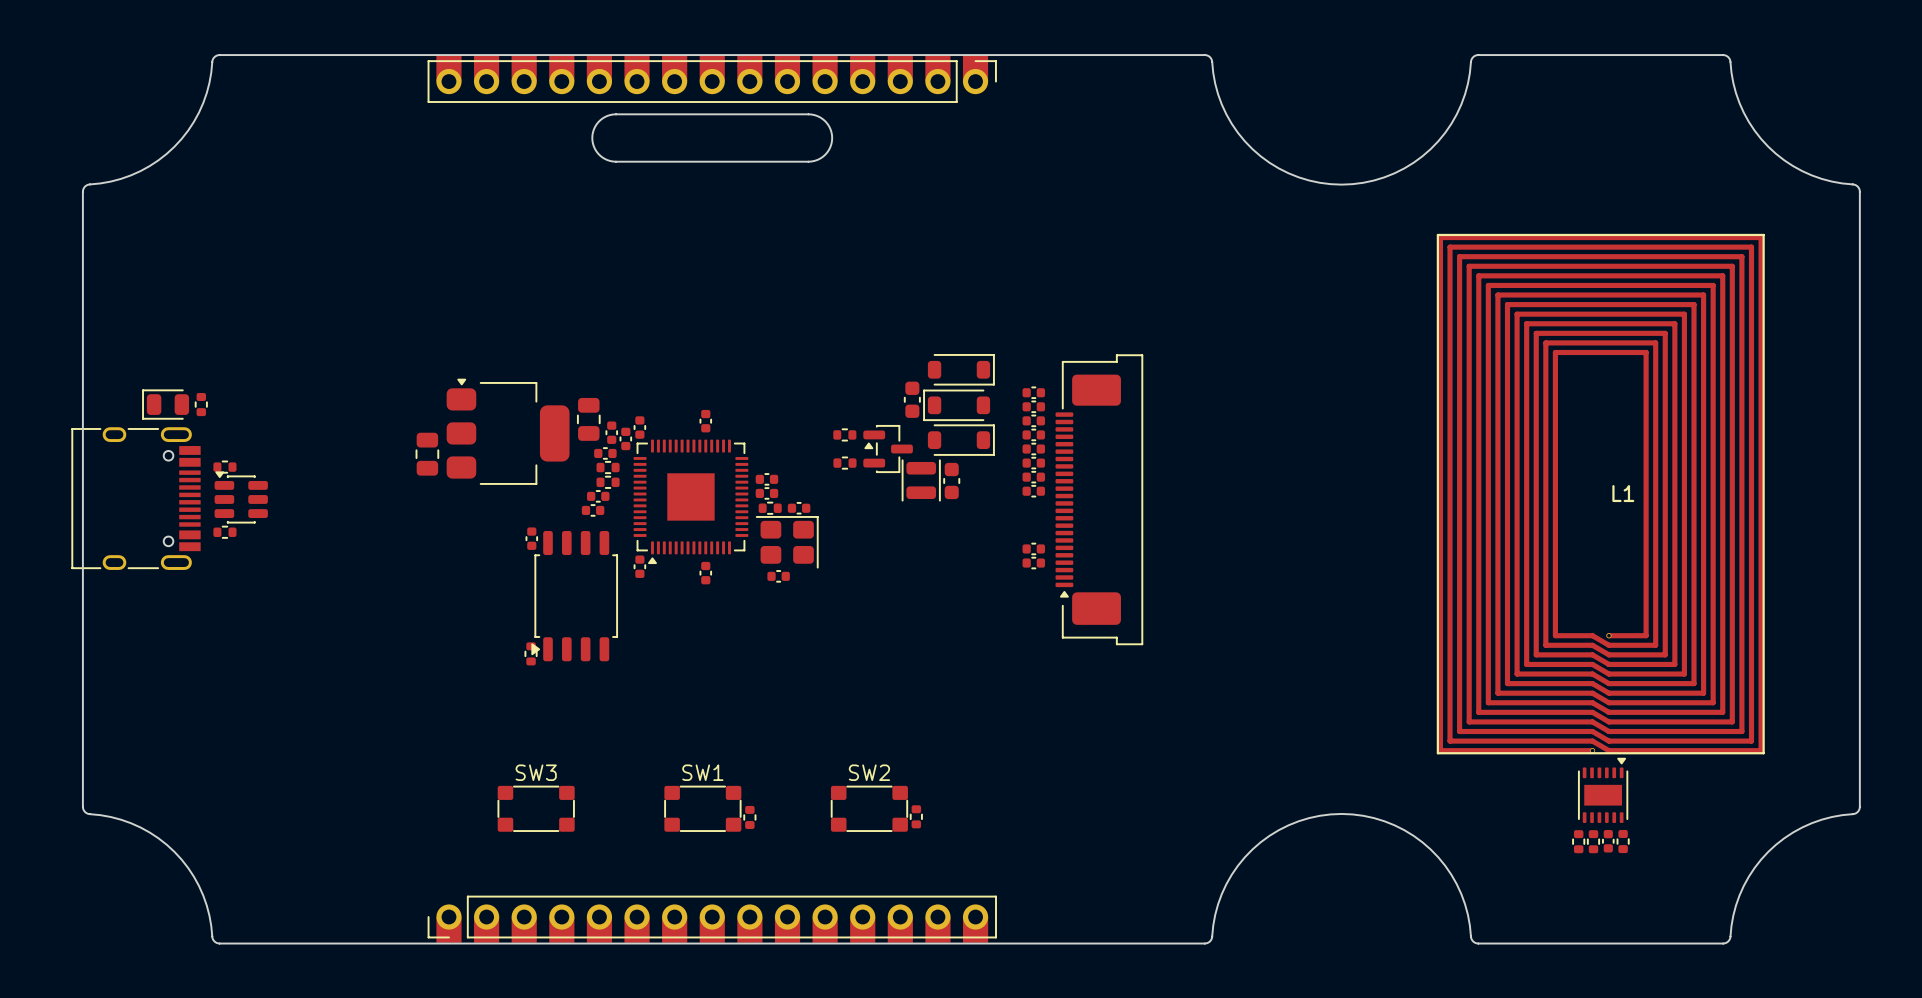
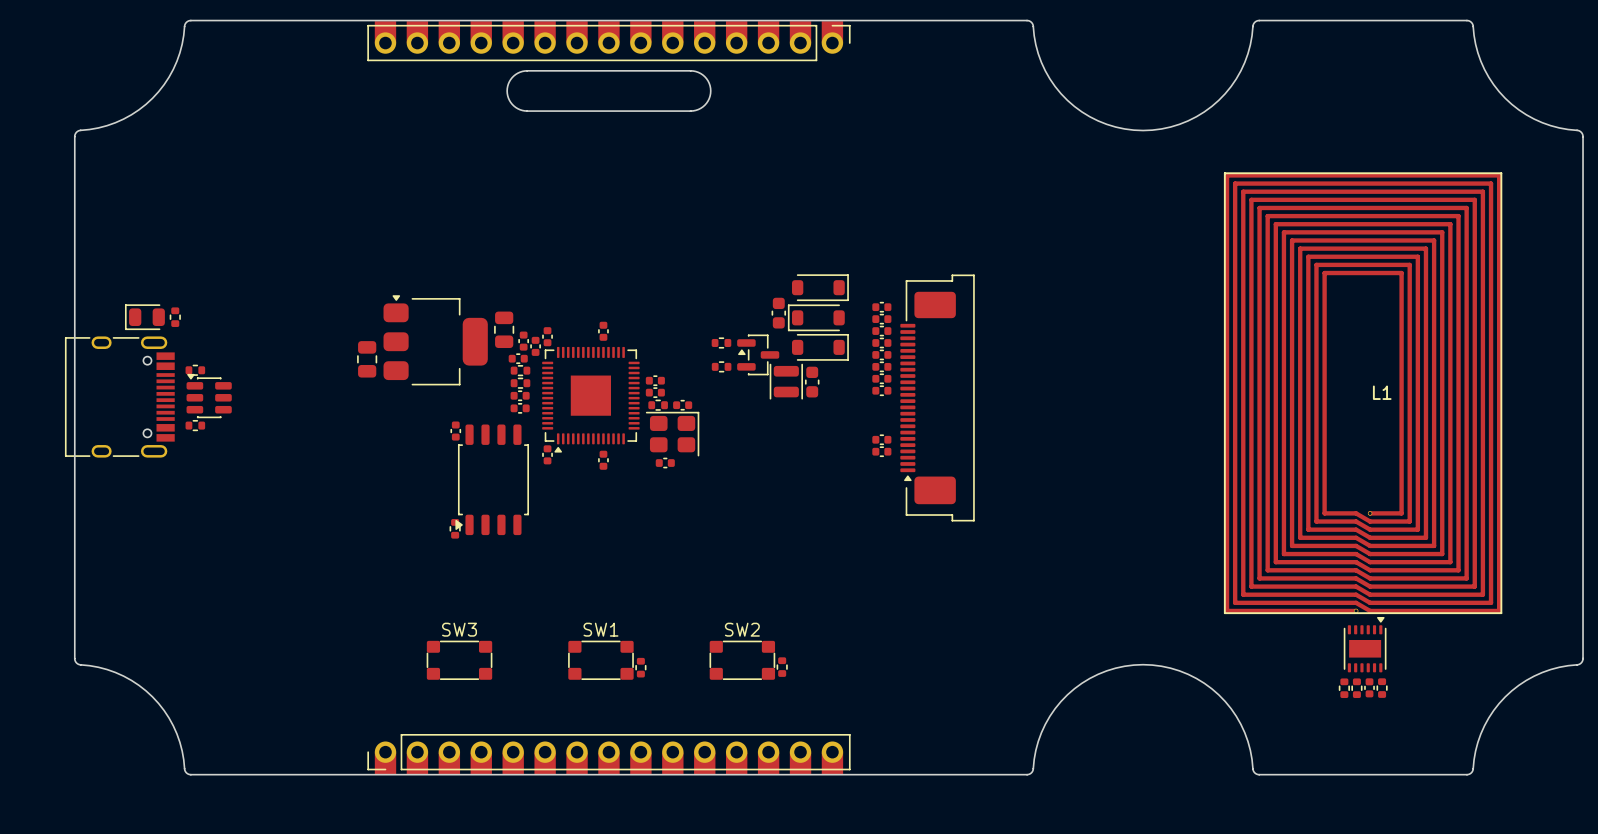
part: (598, 496) -> none
part: none -> (520, 395)
part: (593, 510) -> none
part: none -> (520, 408)

